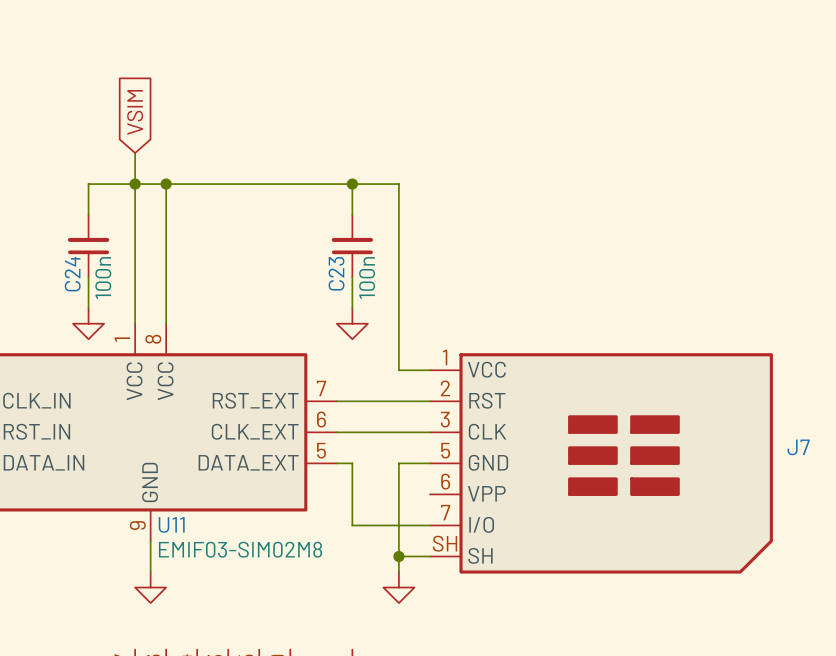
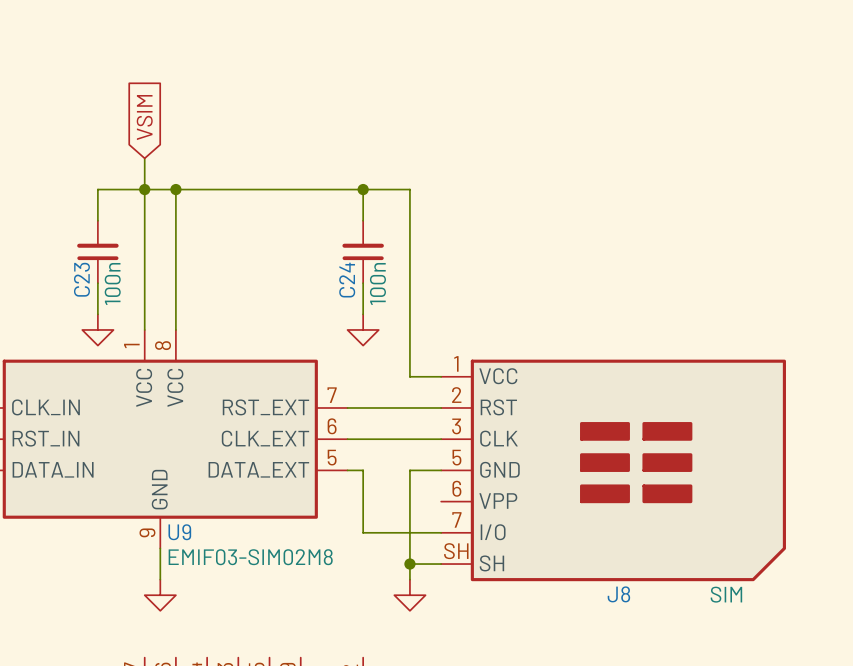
C23 name: C23 (336, 273) -> C24 (347, 280)
C24 name: C24 (72, 274) -> C23 (81, 279)
J7 name: J7 (798, 447) -> J8 (618, 594)
U11 name: U11 (171, 524) -> U9 (179, 532)
J7 value: none -> SIM (726, 594)

